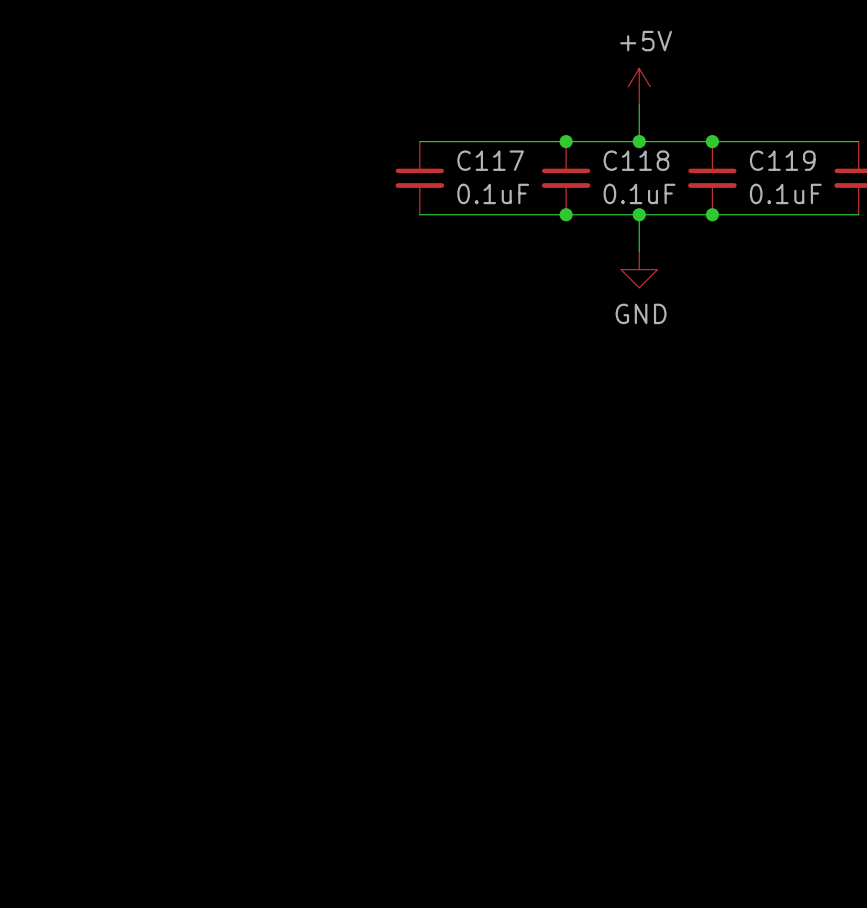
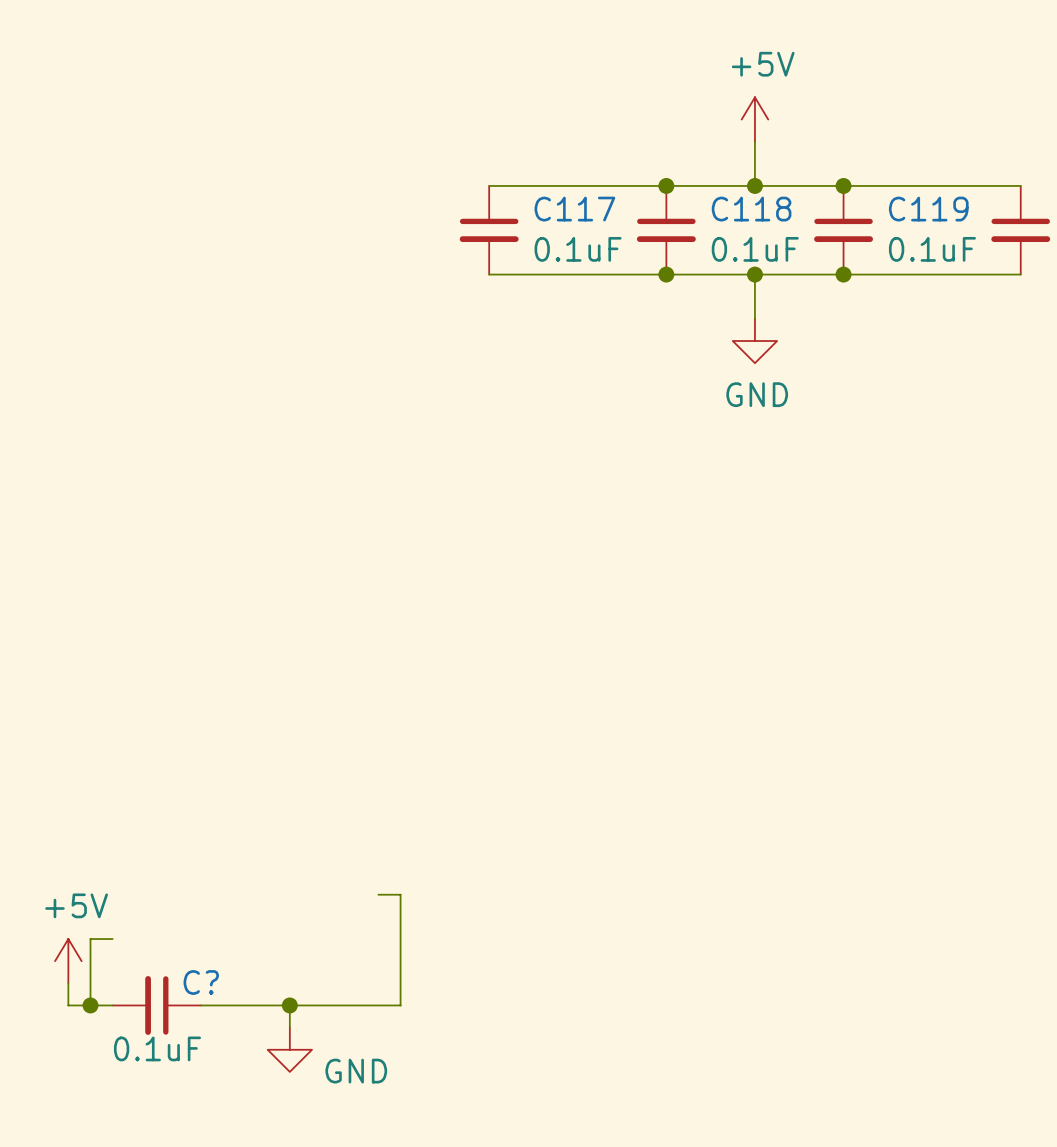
wire: none -> (378, 894) (400, 894) (400, 1005) (201, 1005)
wire: none -> (112, 939) (90, 939) (90, 1005)
power symbol: none -> +5V (68, 961)
wire: none -> (68, 983) (68, 1005) (112, 1005)
junction: none -> (90, 1005)
C?: none -> 0.1uF (156, 1005)
wire: none -> (289, 1005) (289, 1027)
junction: none -> (289, 1005)
power symbol: none -> GND (289, 1049)

